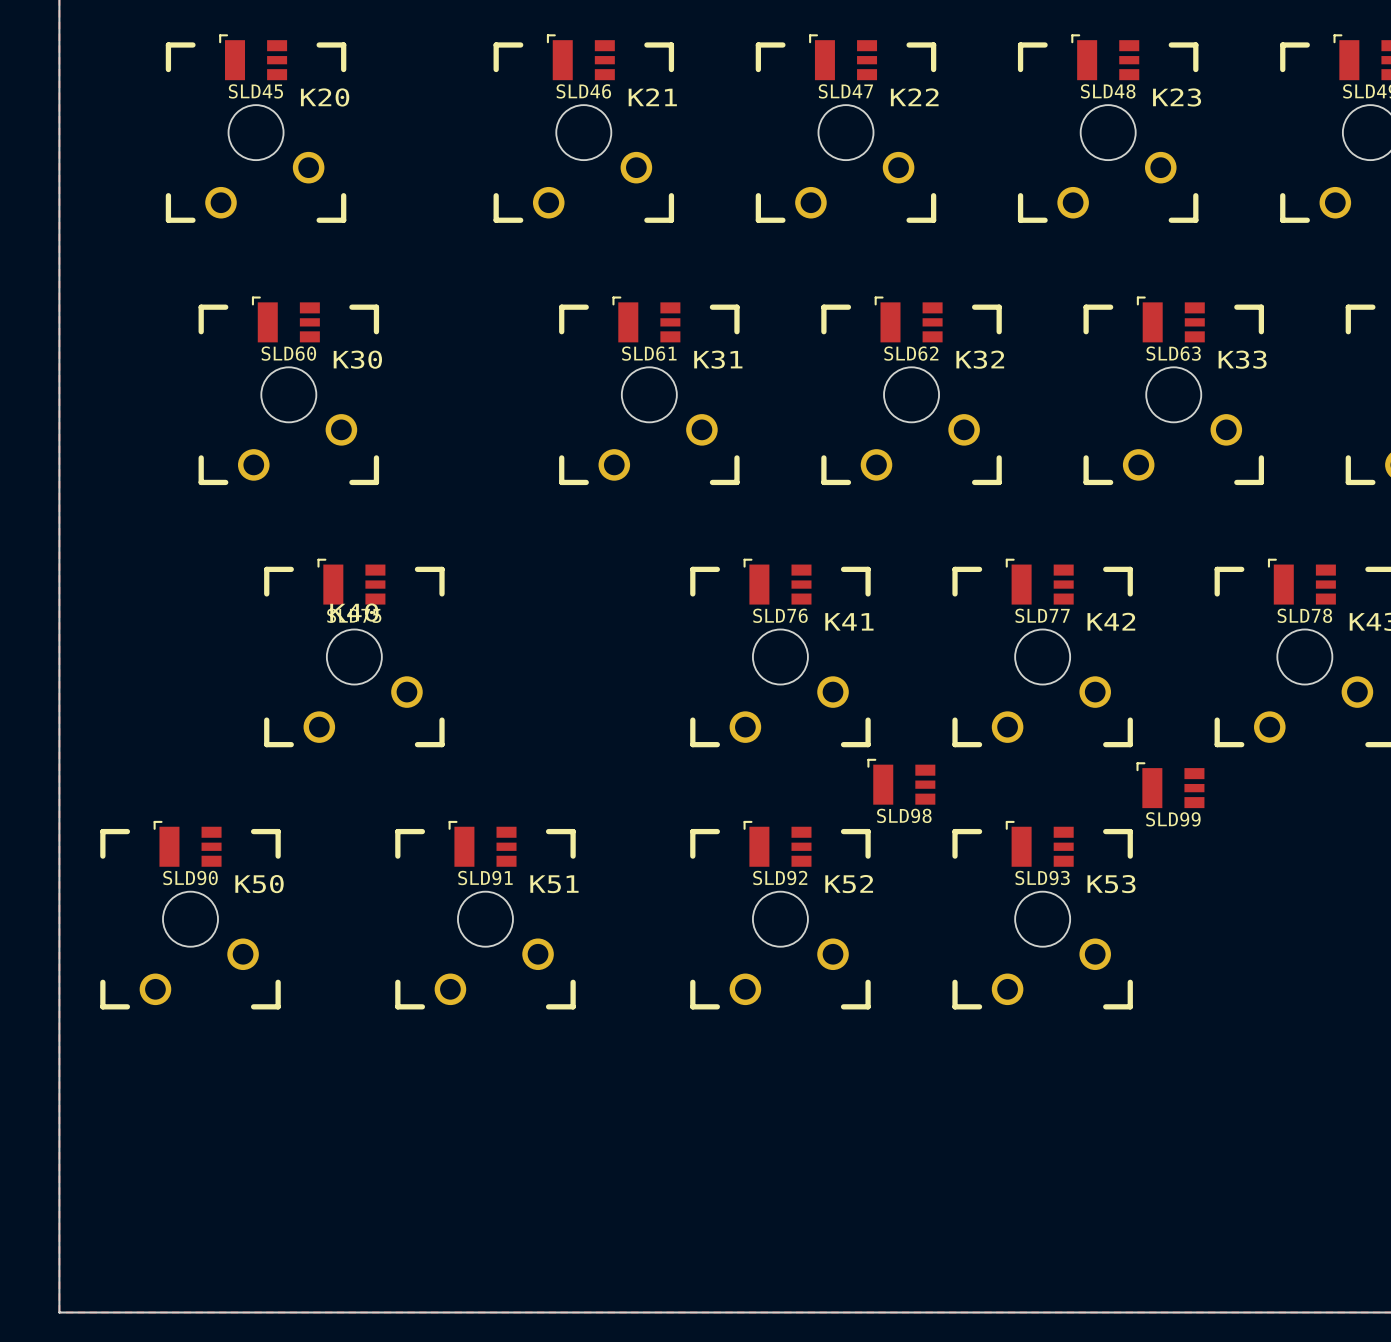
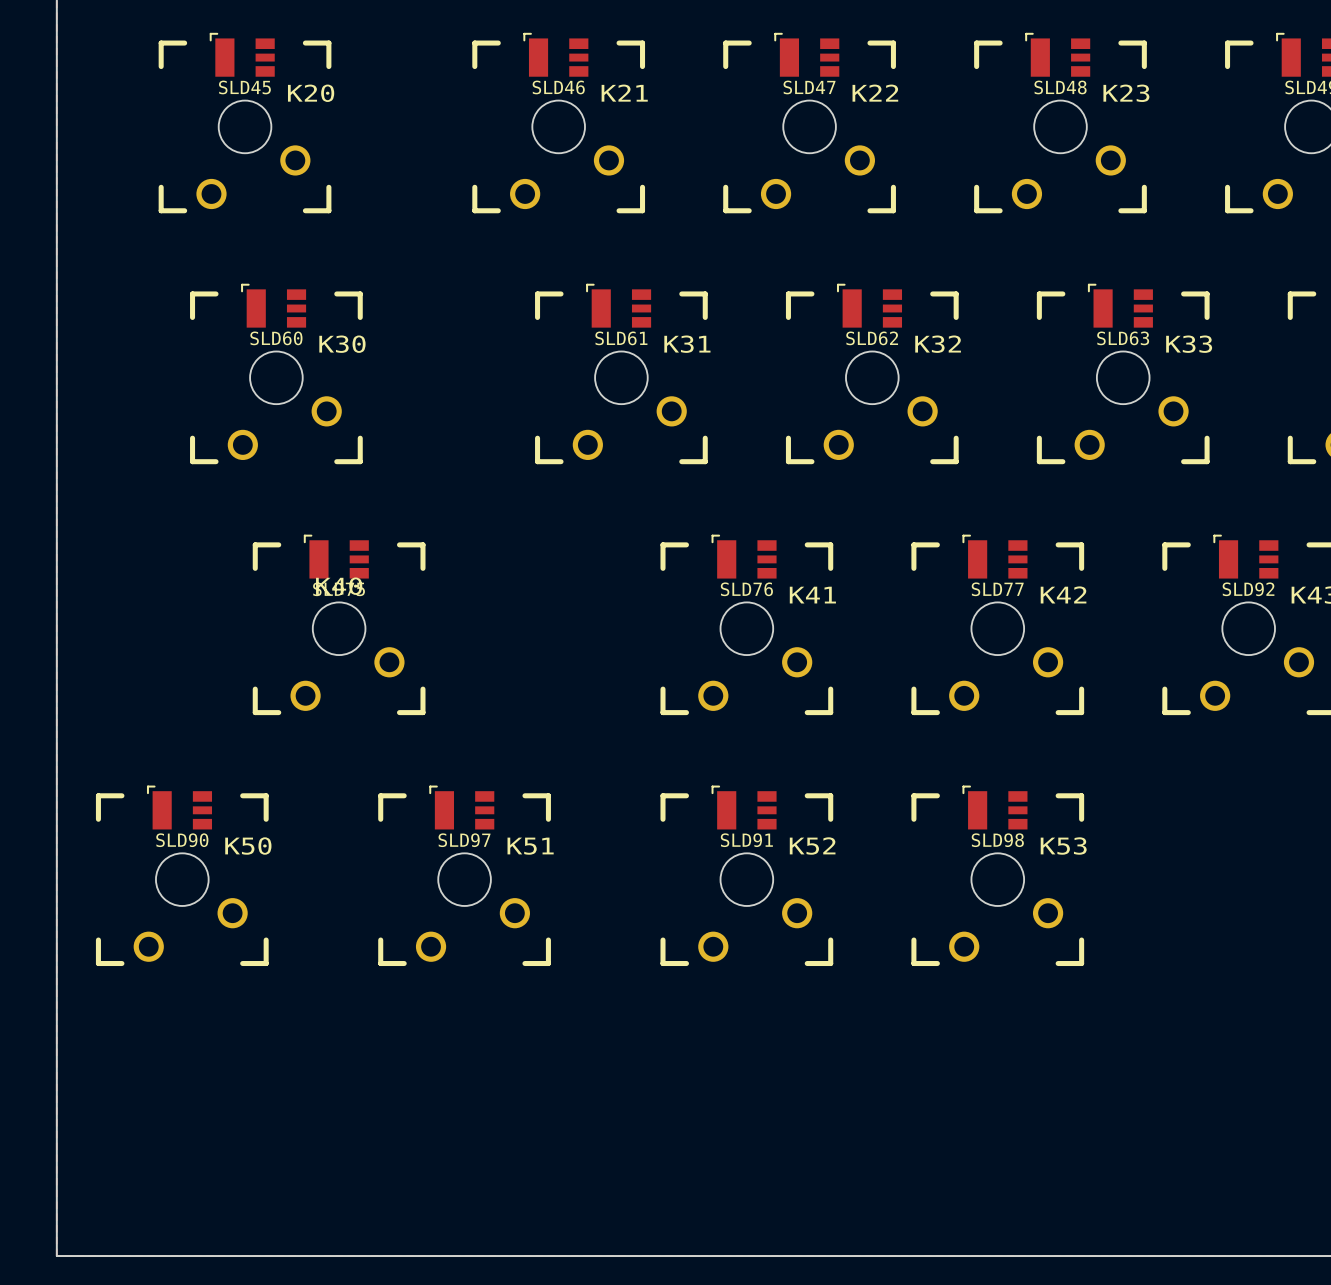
SLD78 name: SLD78 (1304, 615) -> SLD92 (1248, 589)
SLD98: (901, 781) -> none
SLD99: (1170, 785) -> none
SLD91 name: SLD91 (485, 877) -> SLD97 (464, 840)
SLD92 name: SLD92 (780, 877) -> SLD91 (746, 840)
SLD93 name: SLD93 (1042, 877) -> SLD98 (997, 840)

